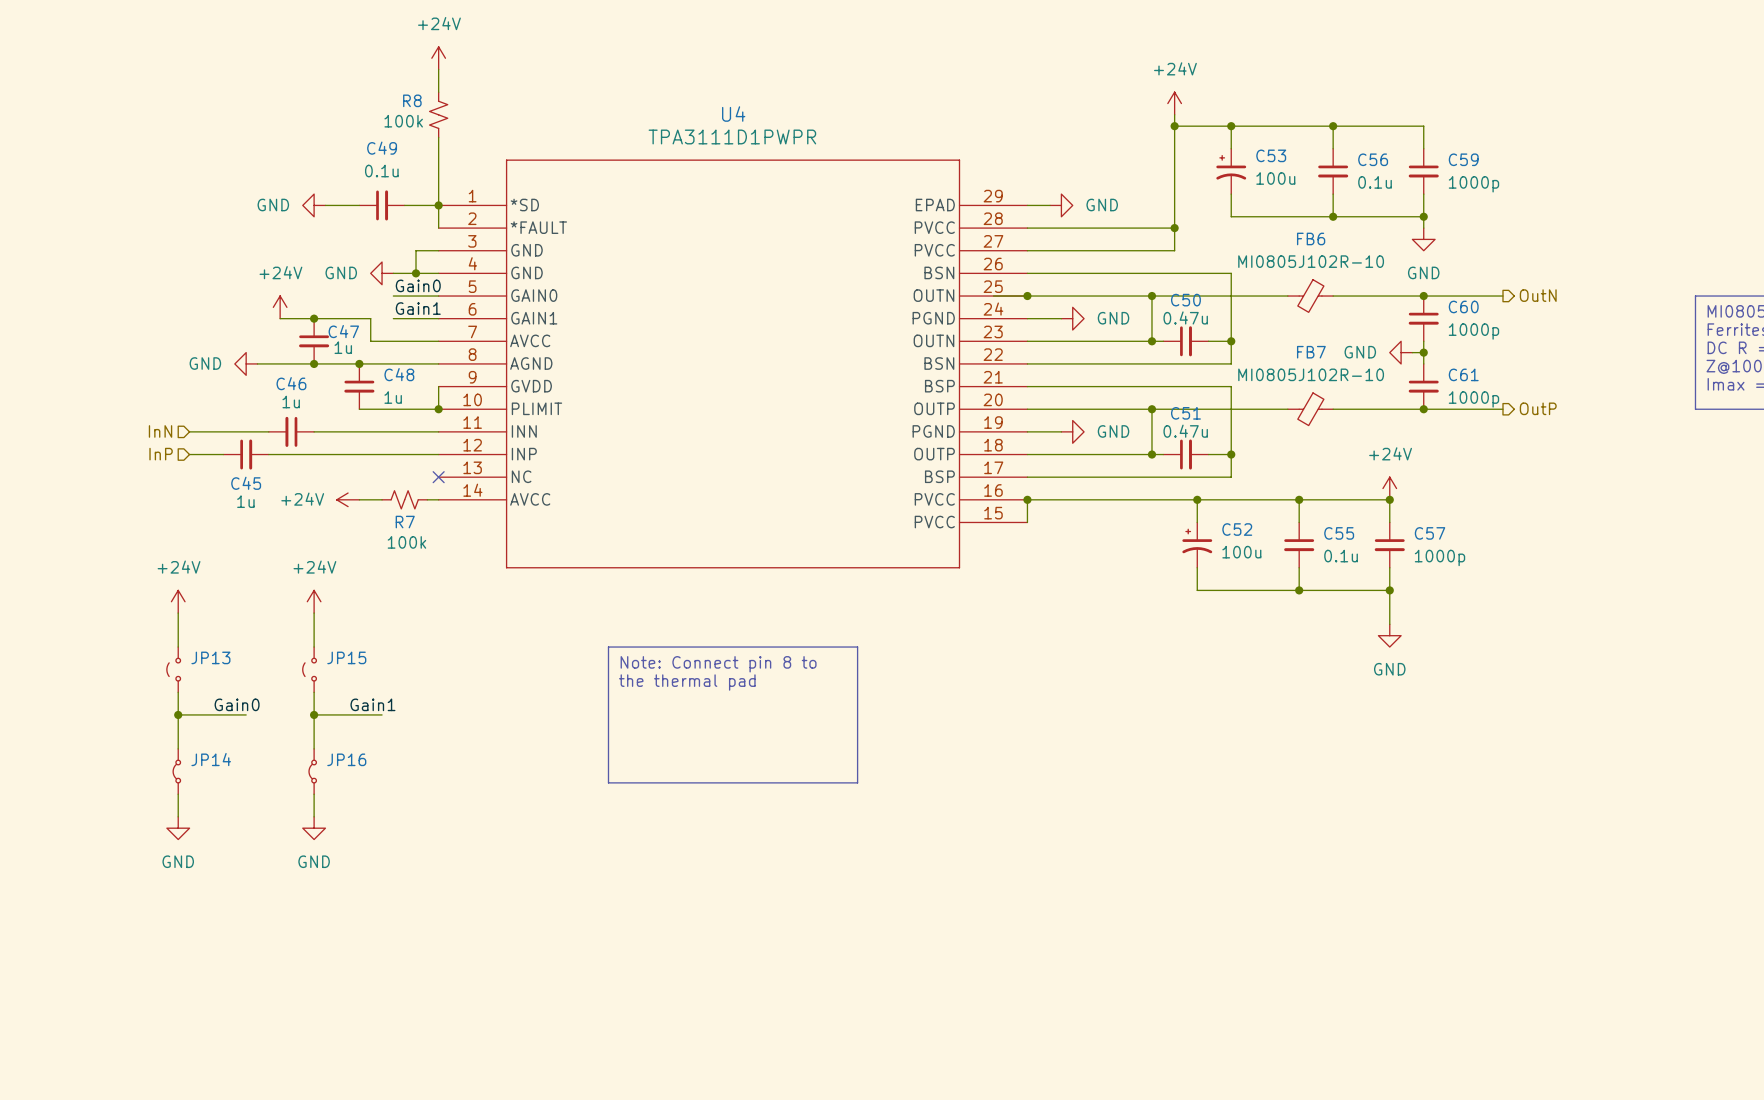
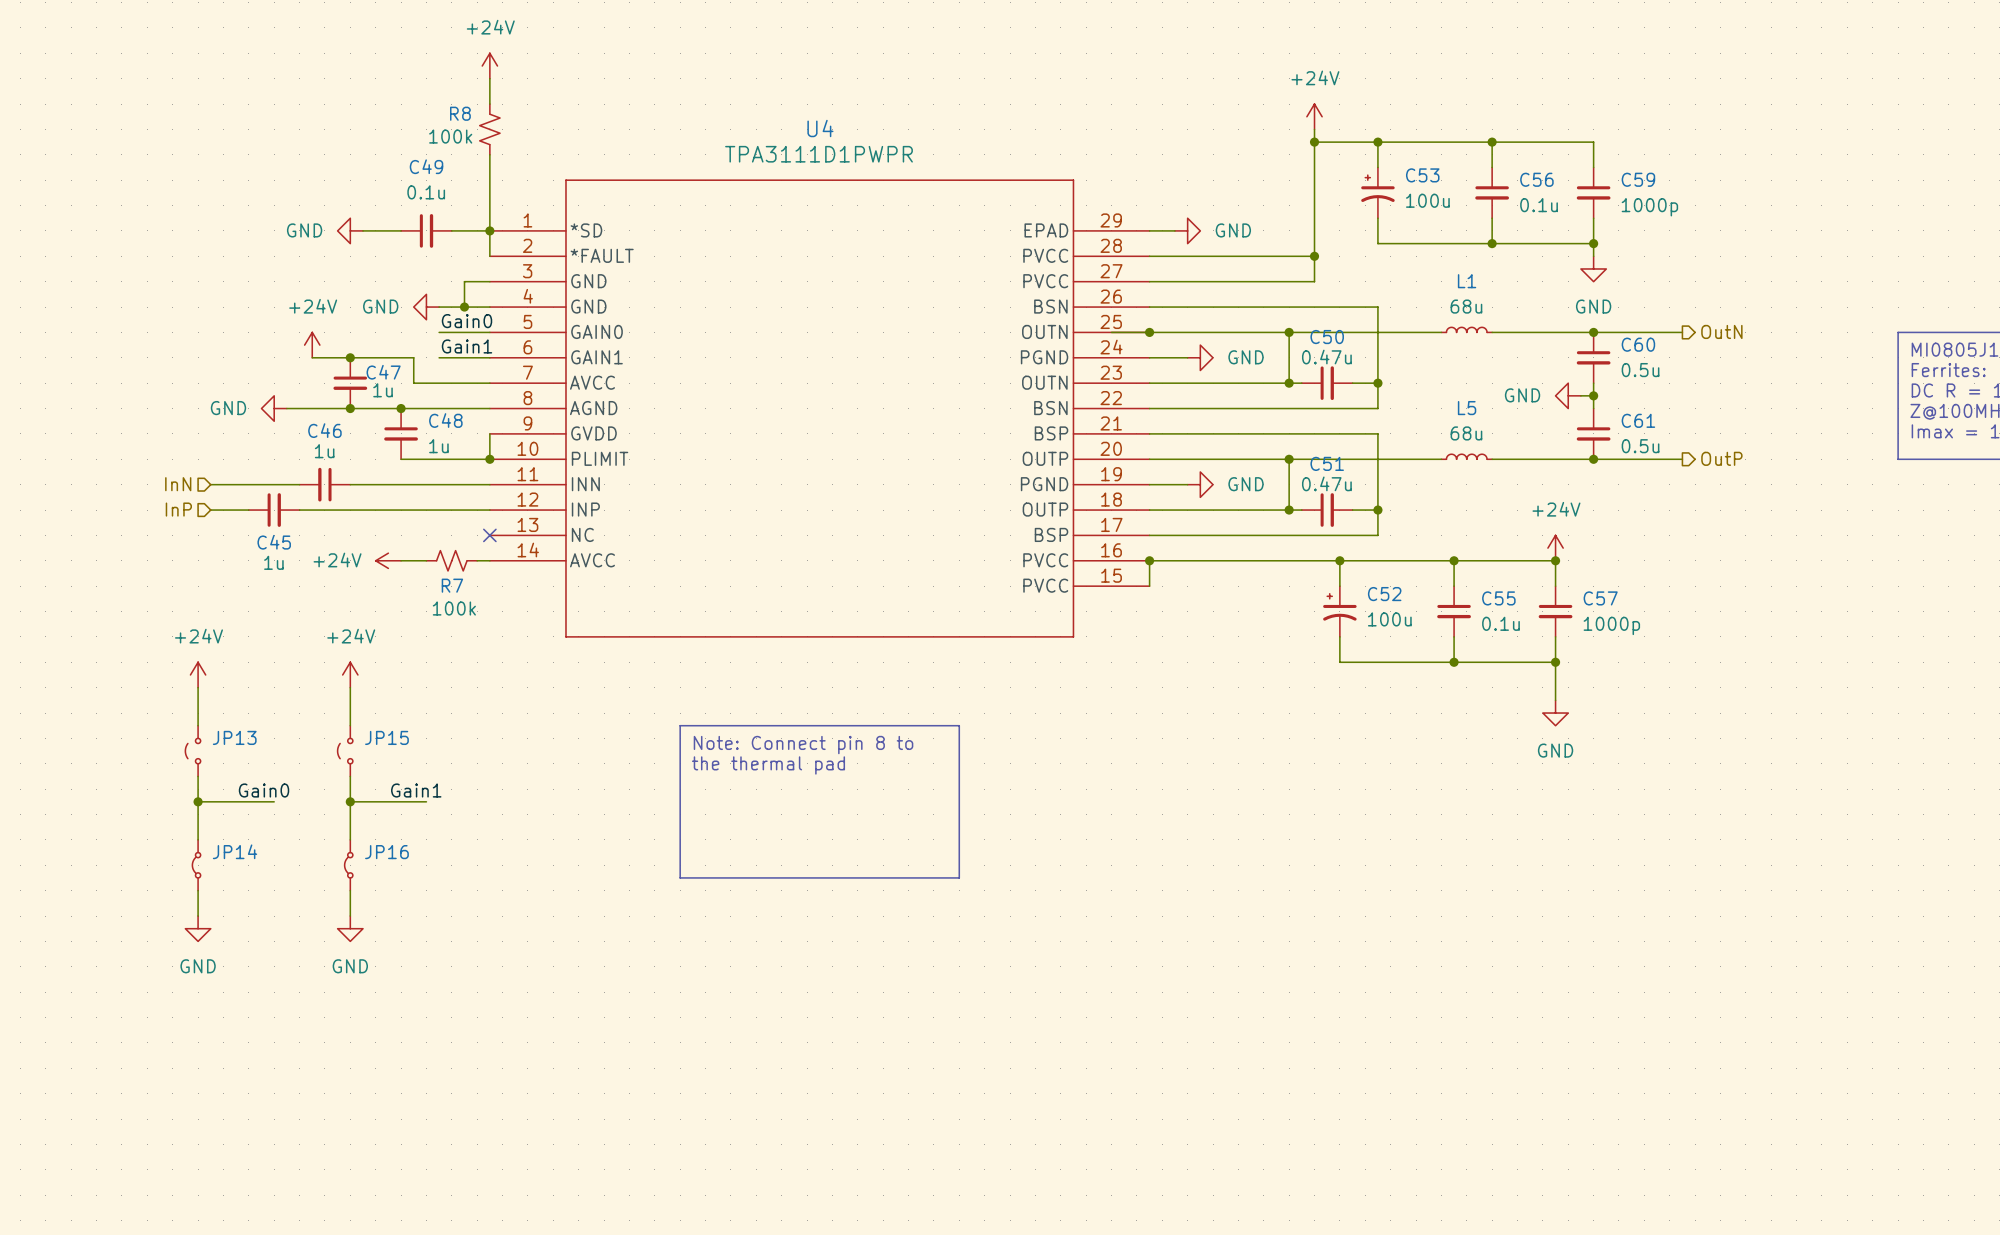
L1: none -> 68u (1466, 329)
FB6: MI0805J102R-10 (1310, 296) -> none
C60 value: 1000p (1473, 331) -> 0.5u (1640, 370)
C61 value: 1000p (1473, 399) -> 0.5u (1640, 446)
L5: none -> 68u (1466, 456)
FB7: MI0805J102R-10 (1310, 409) -> none

